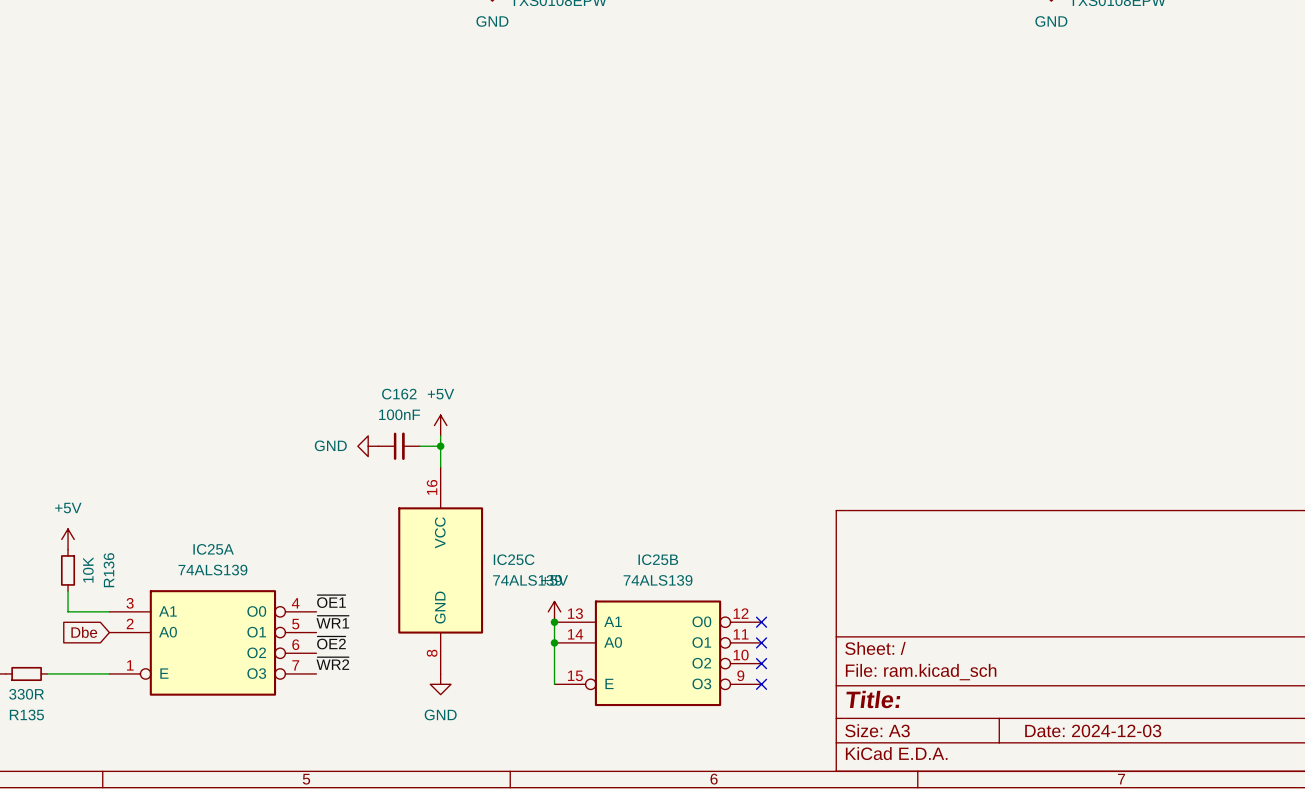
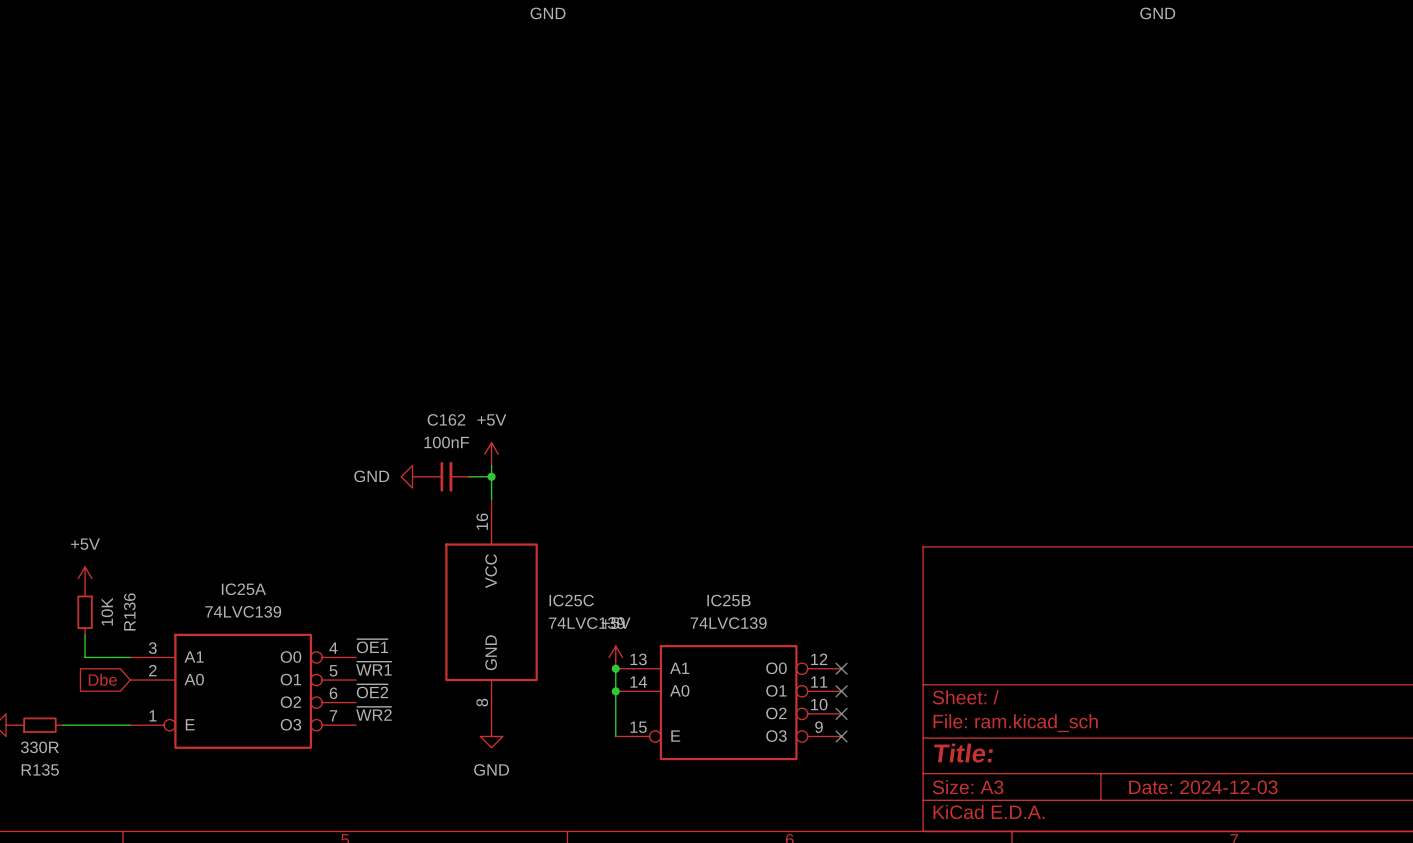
IC25A value: 74ALS139 (212, 570) -> 74LVC139 (243, 611)
IC25C value: 74ALS139 (527, 580) -> 74LVC139 (586, 623)
IC25B value: 74ALS139 (658, 580) -> 74LVC139 (728, 623)

